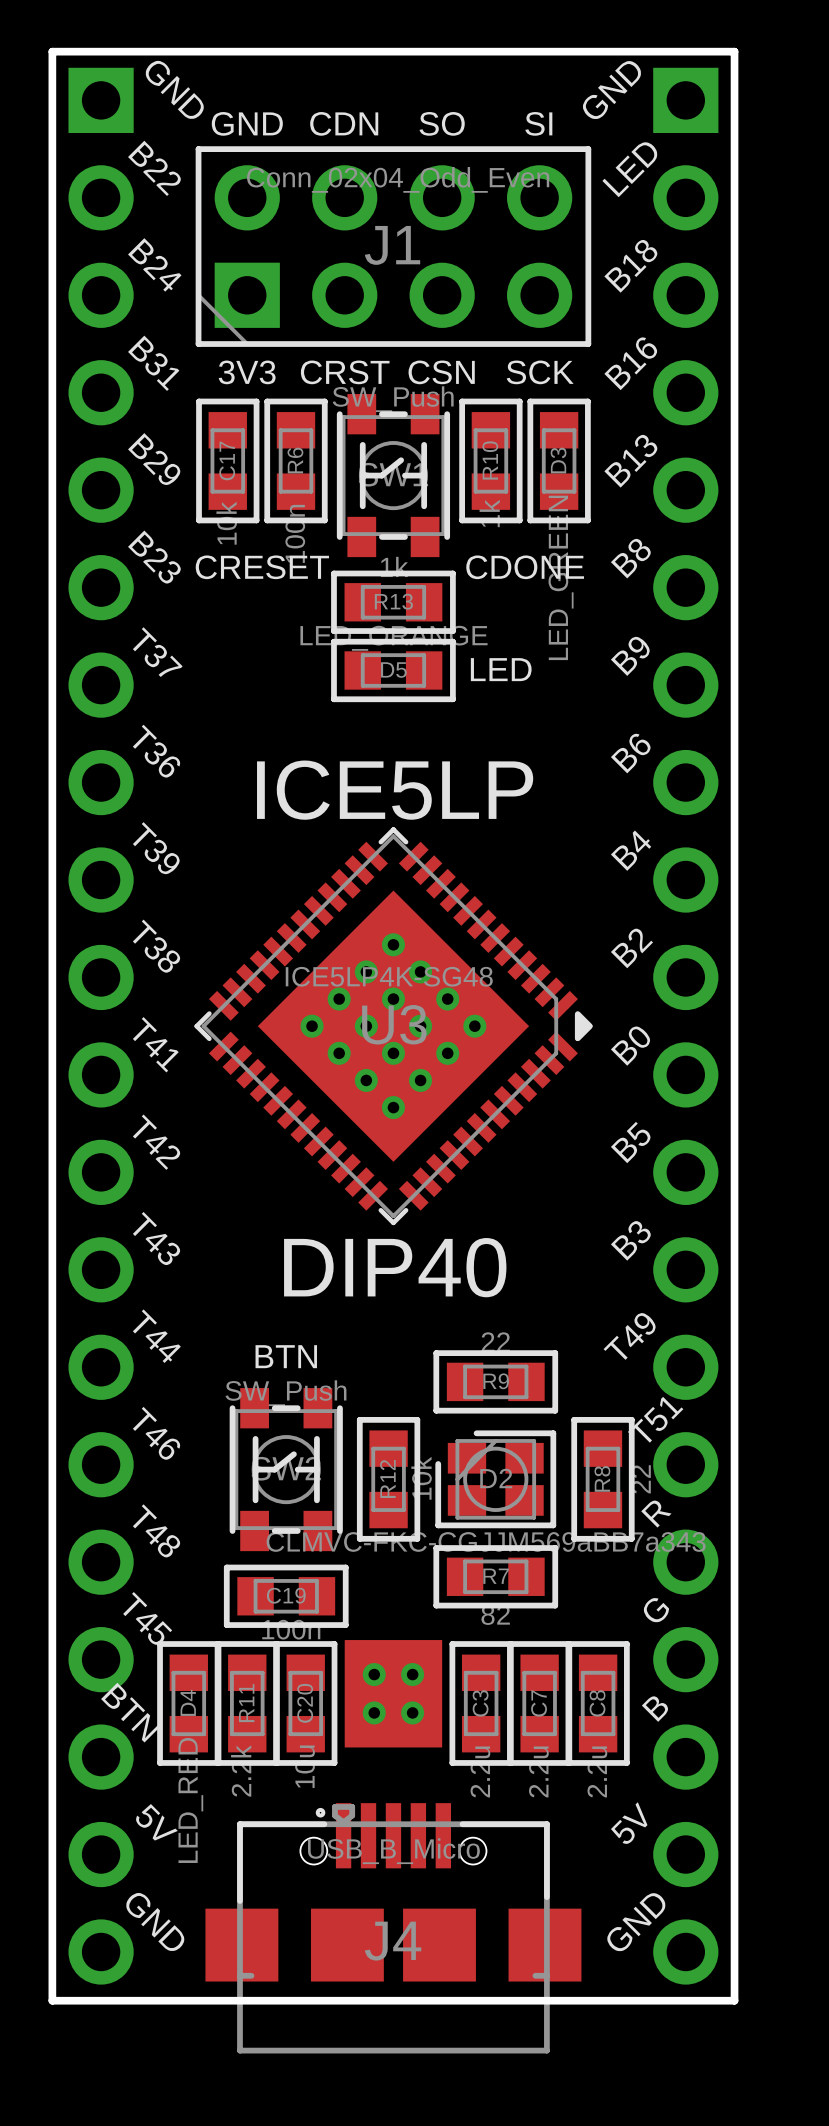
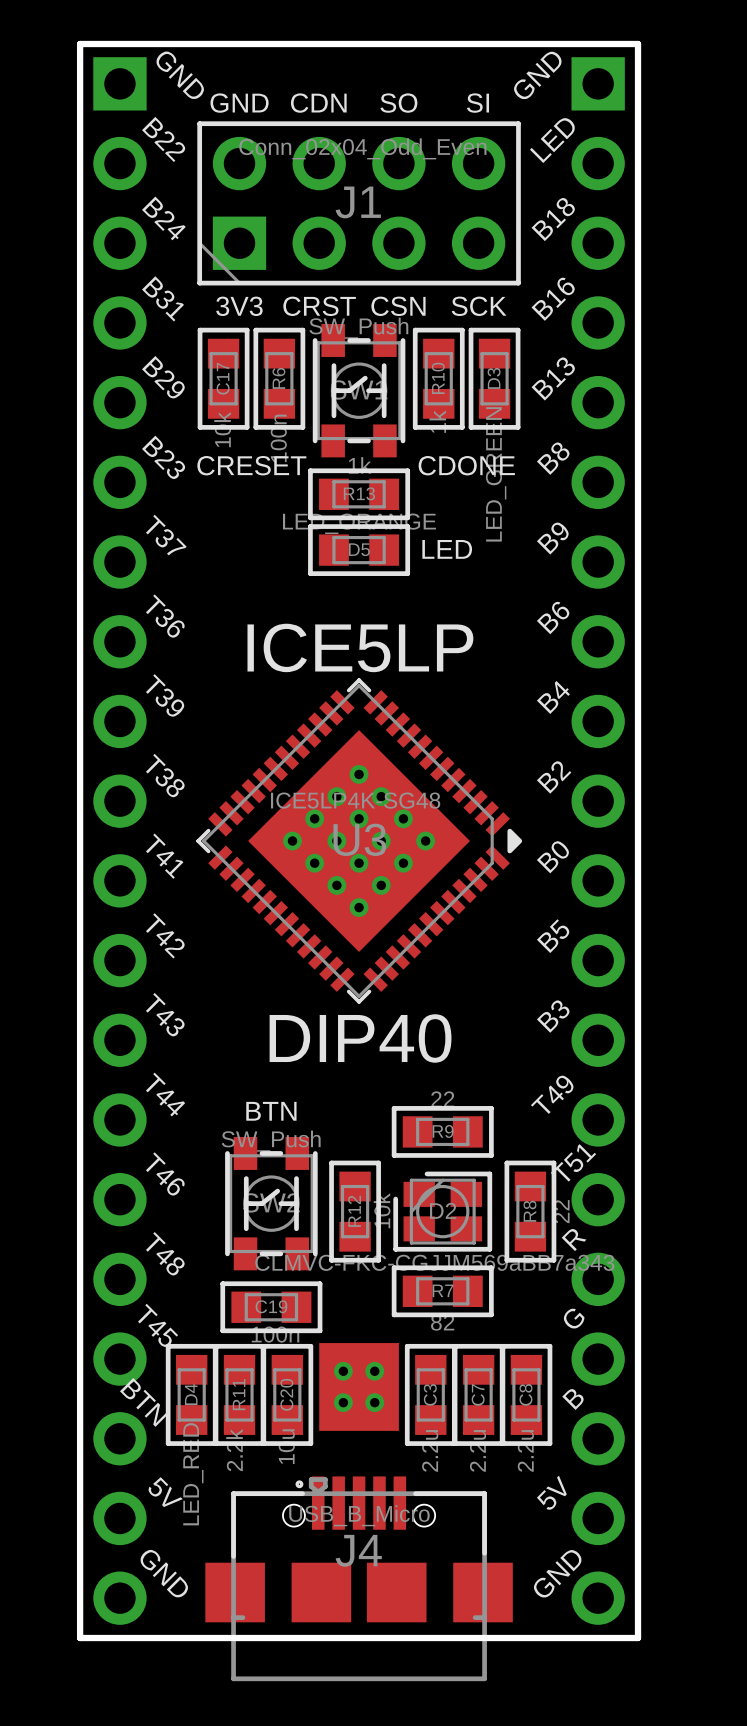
J4 name position: J4 (393, 1941) -> J4 (358, 1550)

